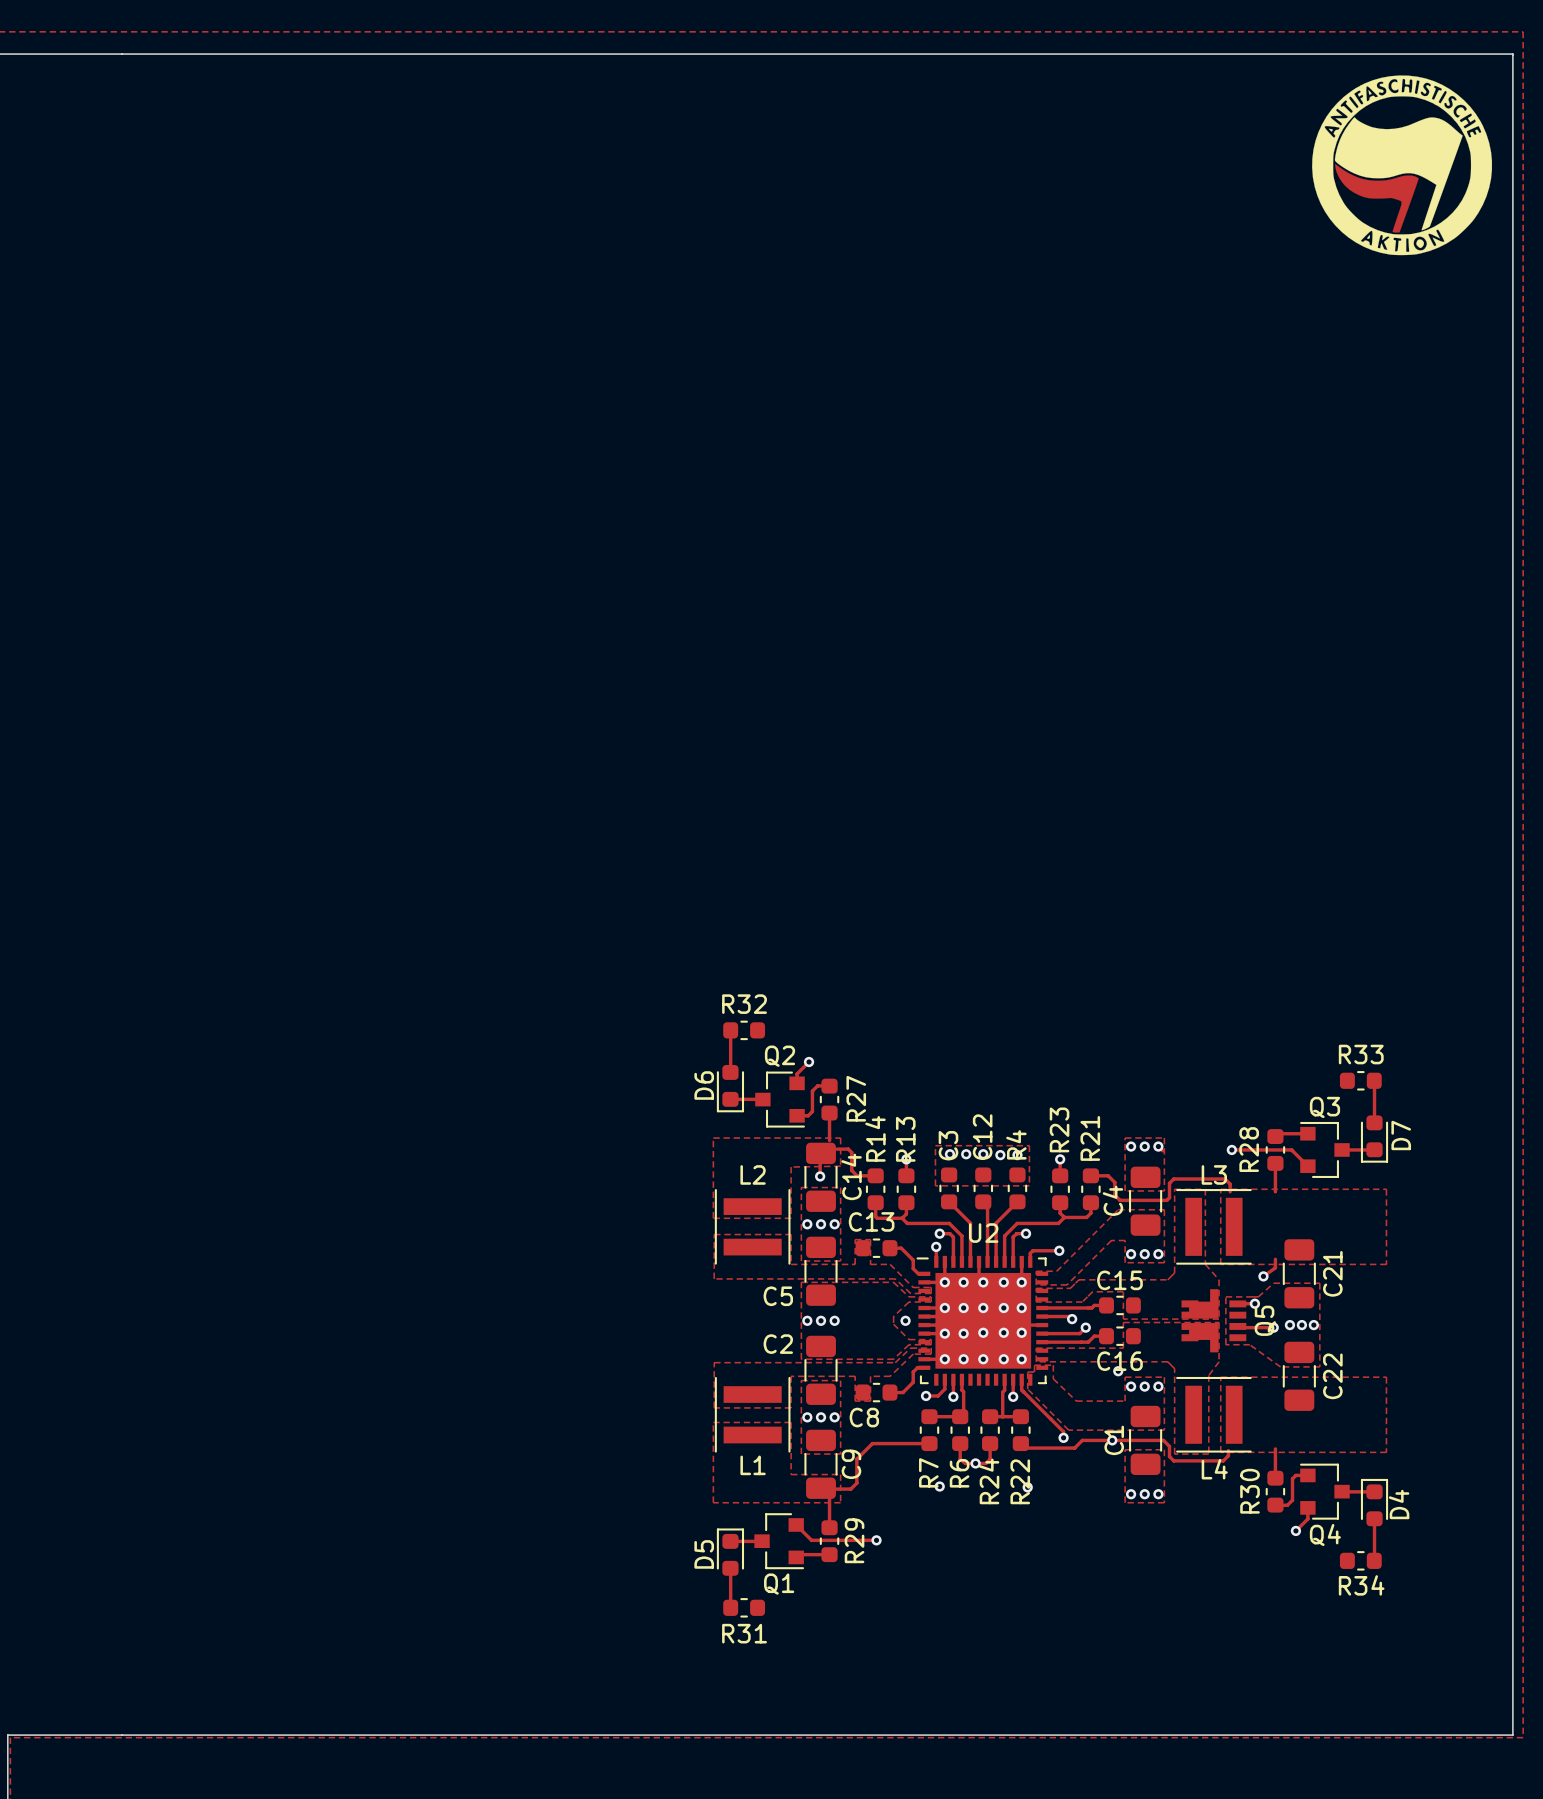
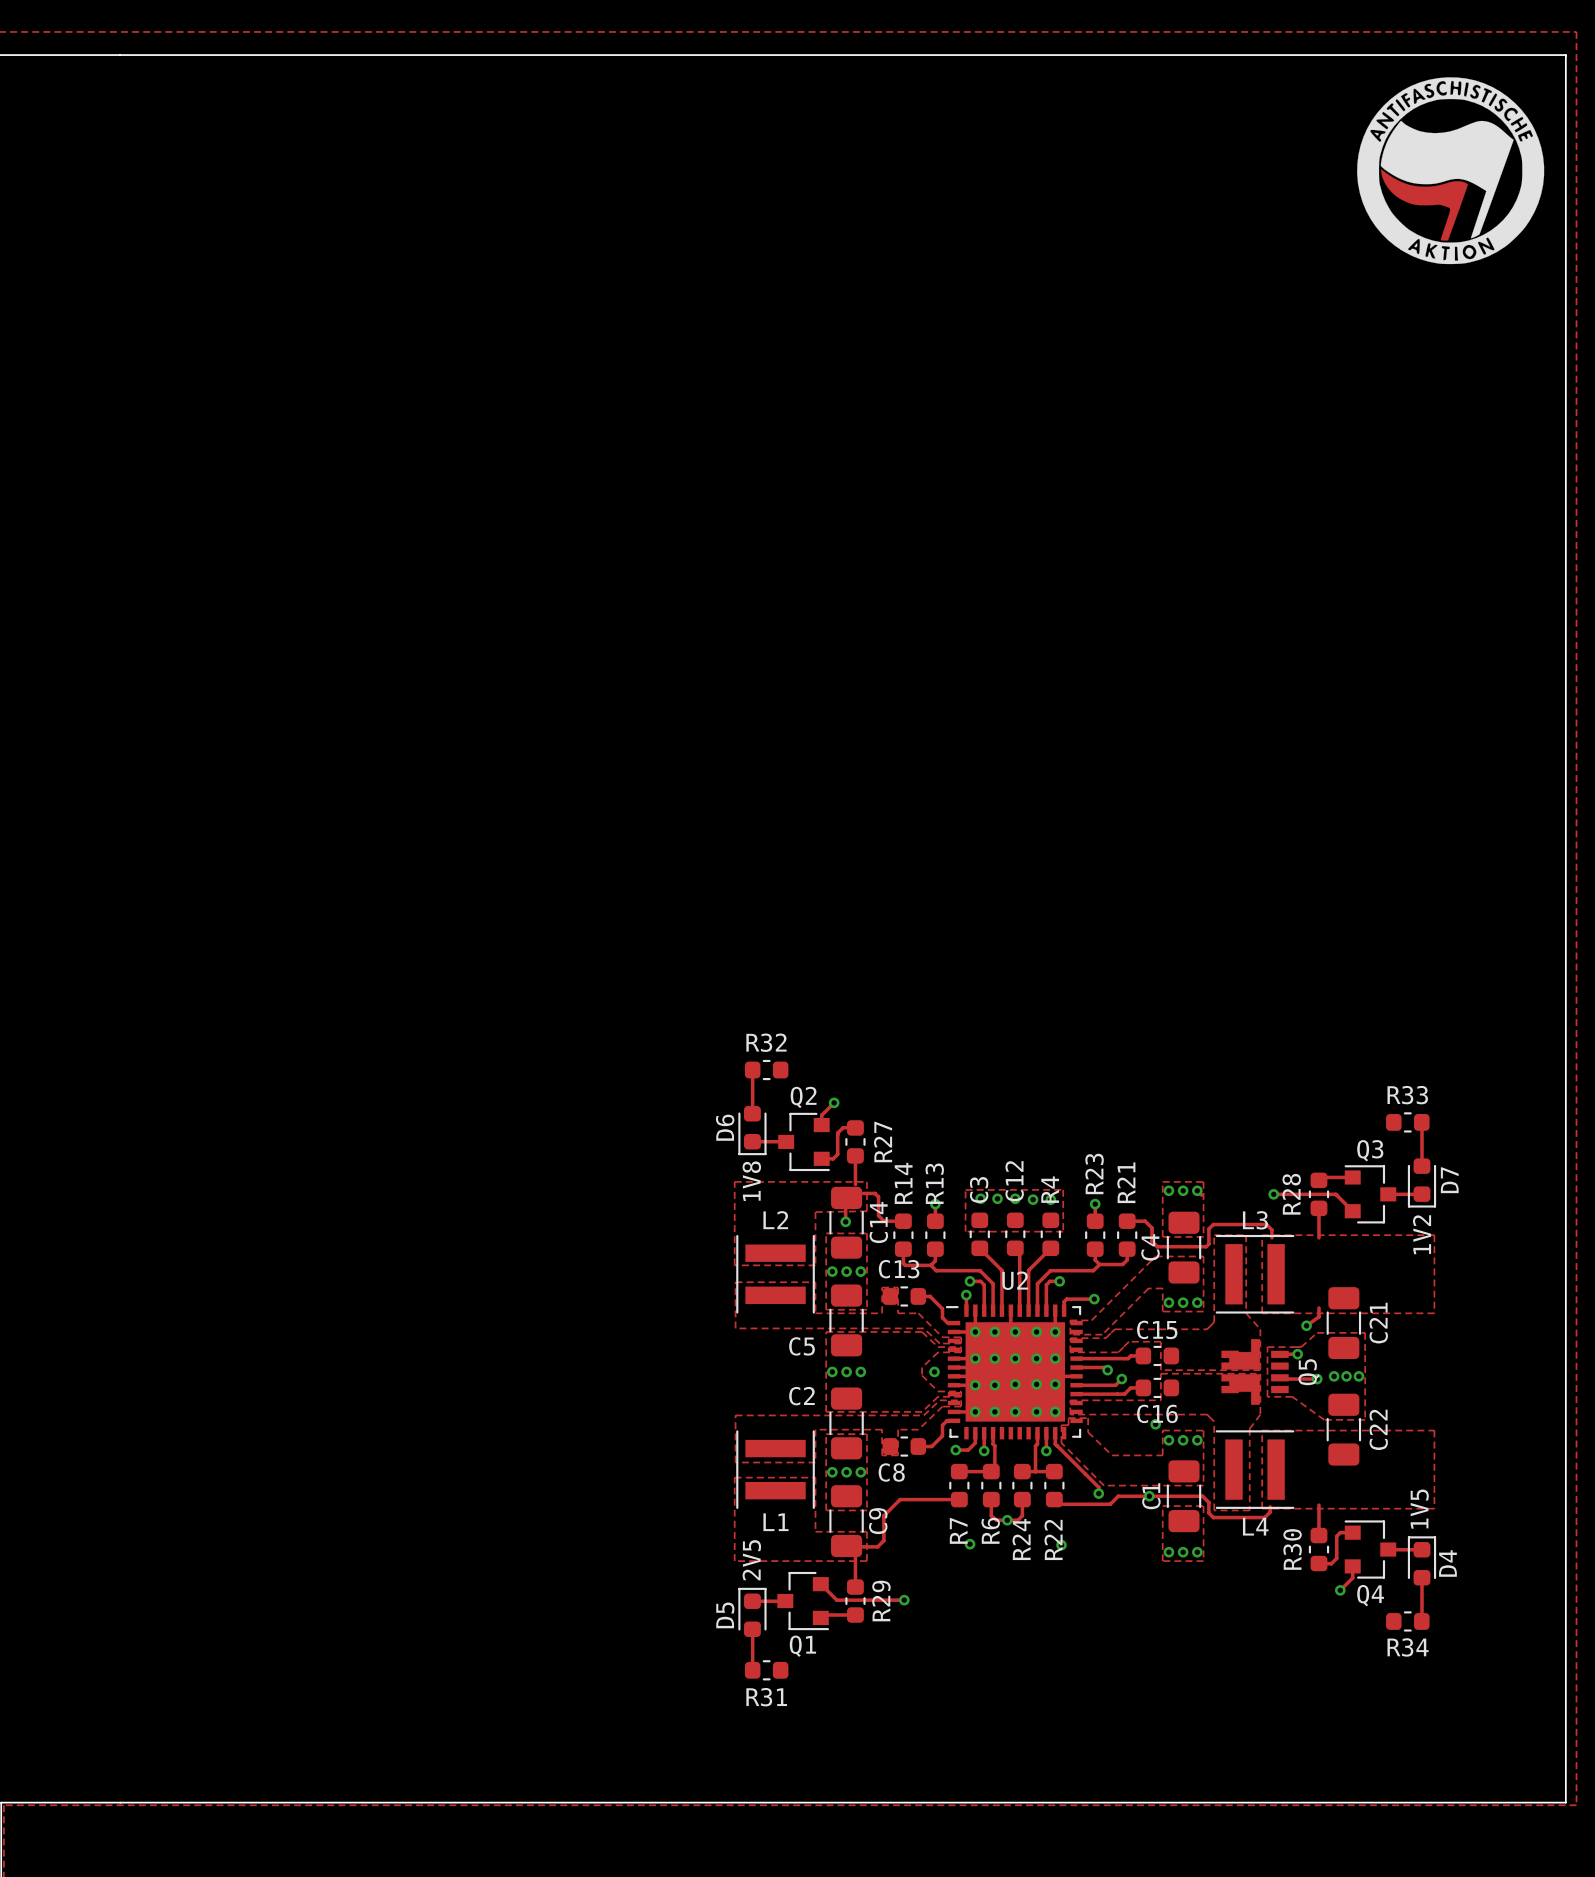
text: none -> 1V8 (751, 1181)
text: none -> 1V2 (1422, 1234)
text: none -> 1V5 (1419, 1509)
text: none -> 2V5 (751, 1560)

